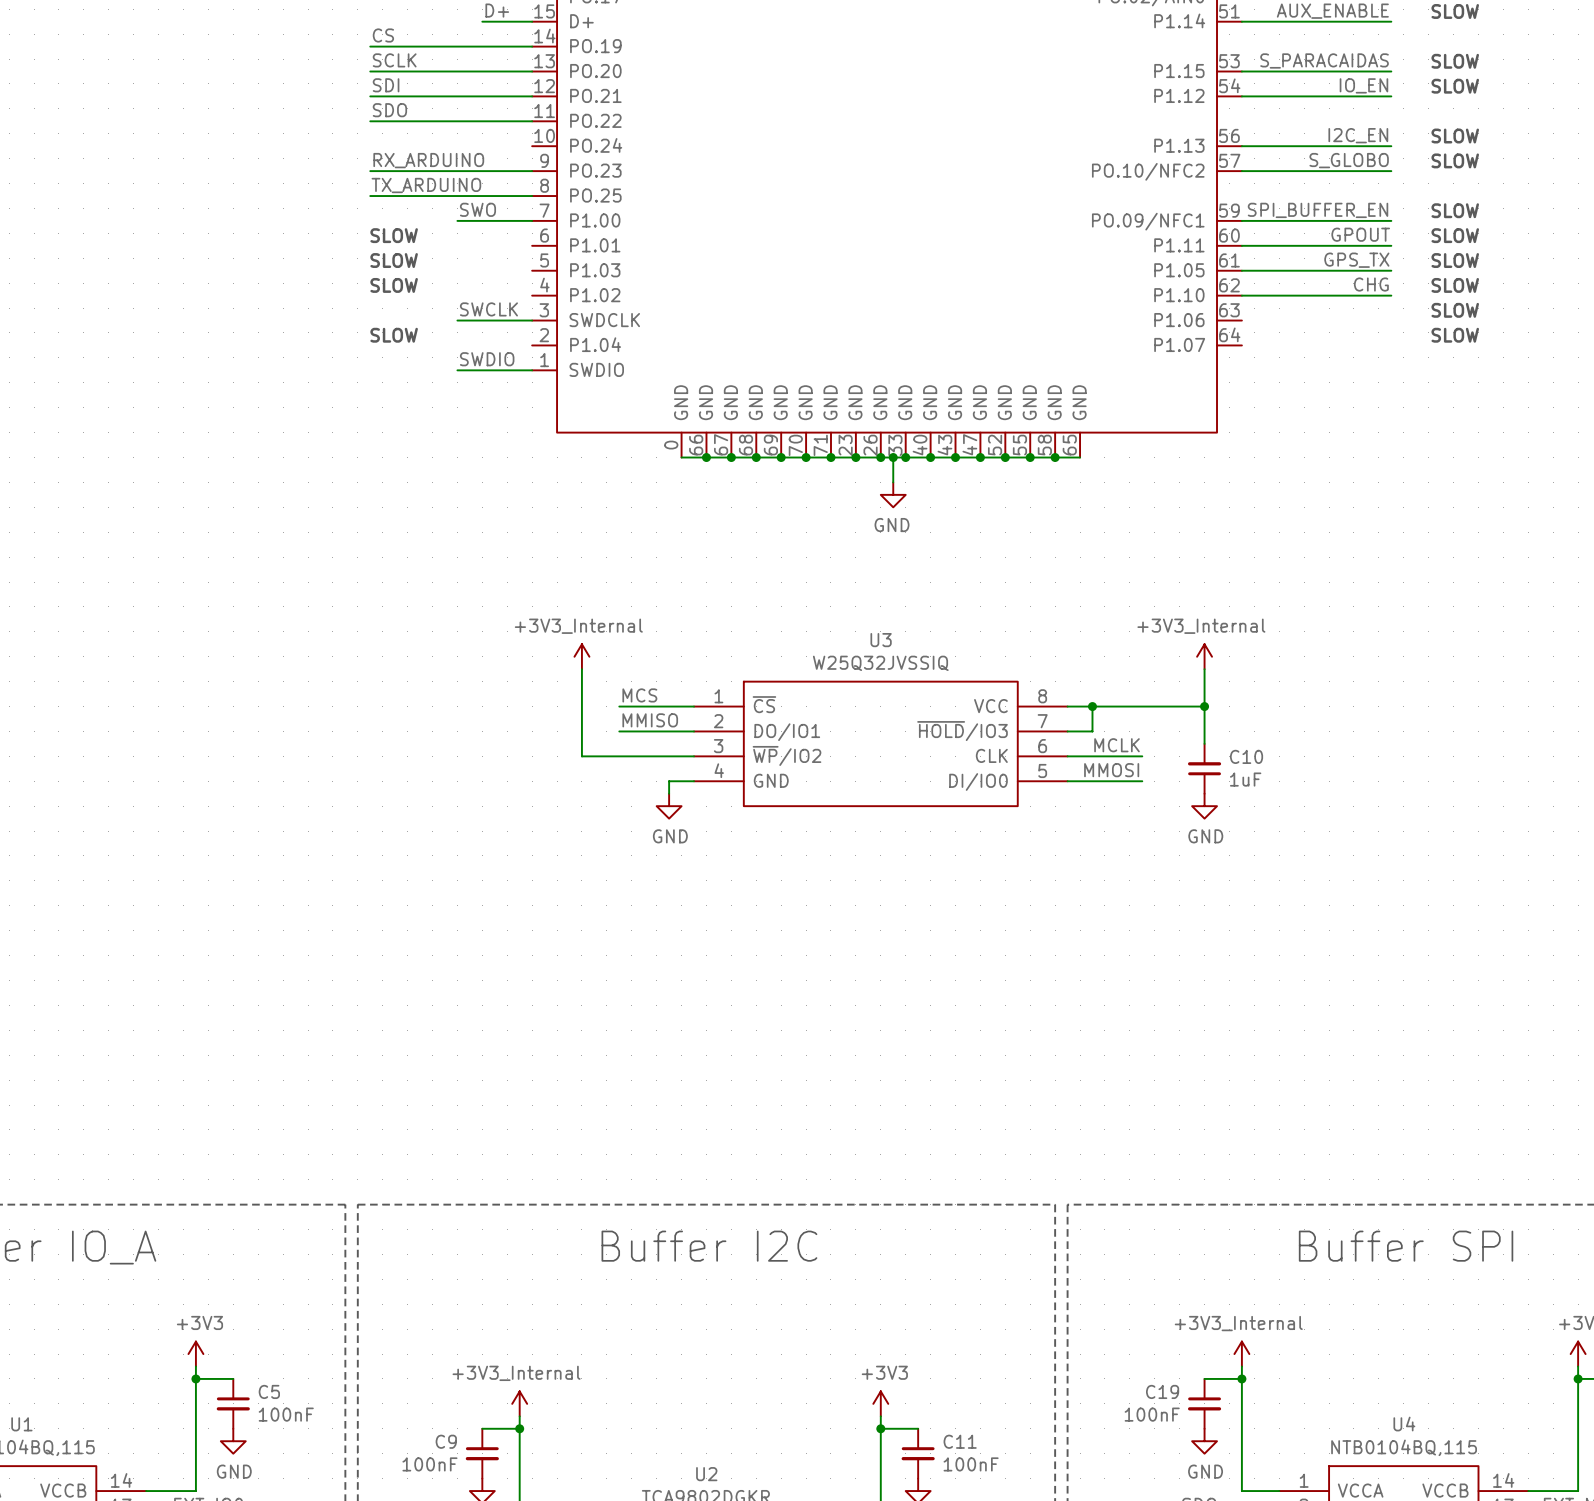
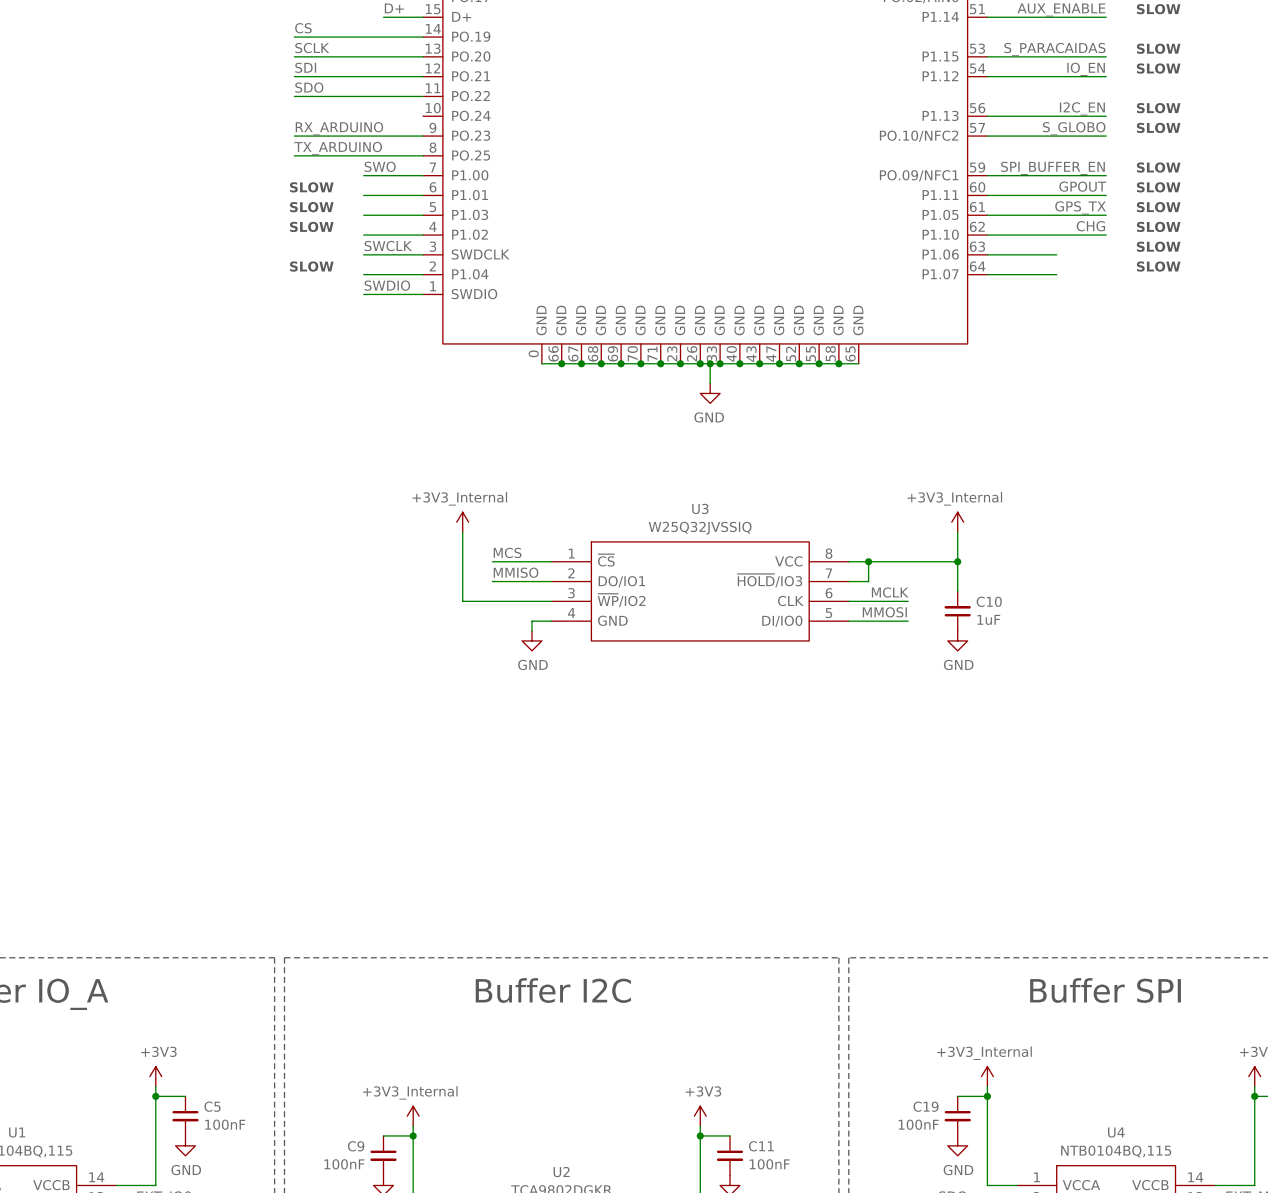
wire: none -> (363, 195) (423, 195)
wire: none -> (363, 215) (423, 215)
wire: none -> (363, 235) (423, 235)
wire: none -> (987, 254) (1056, 254)
wire: none -> (363, 274) (423, 274)
wire: none -> (987, 274) (1056, 274)

